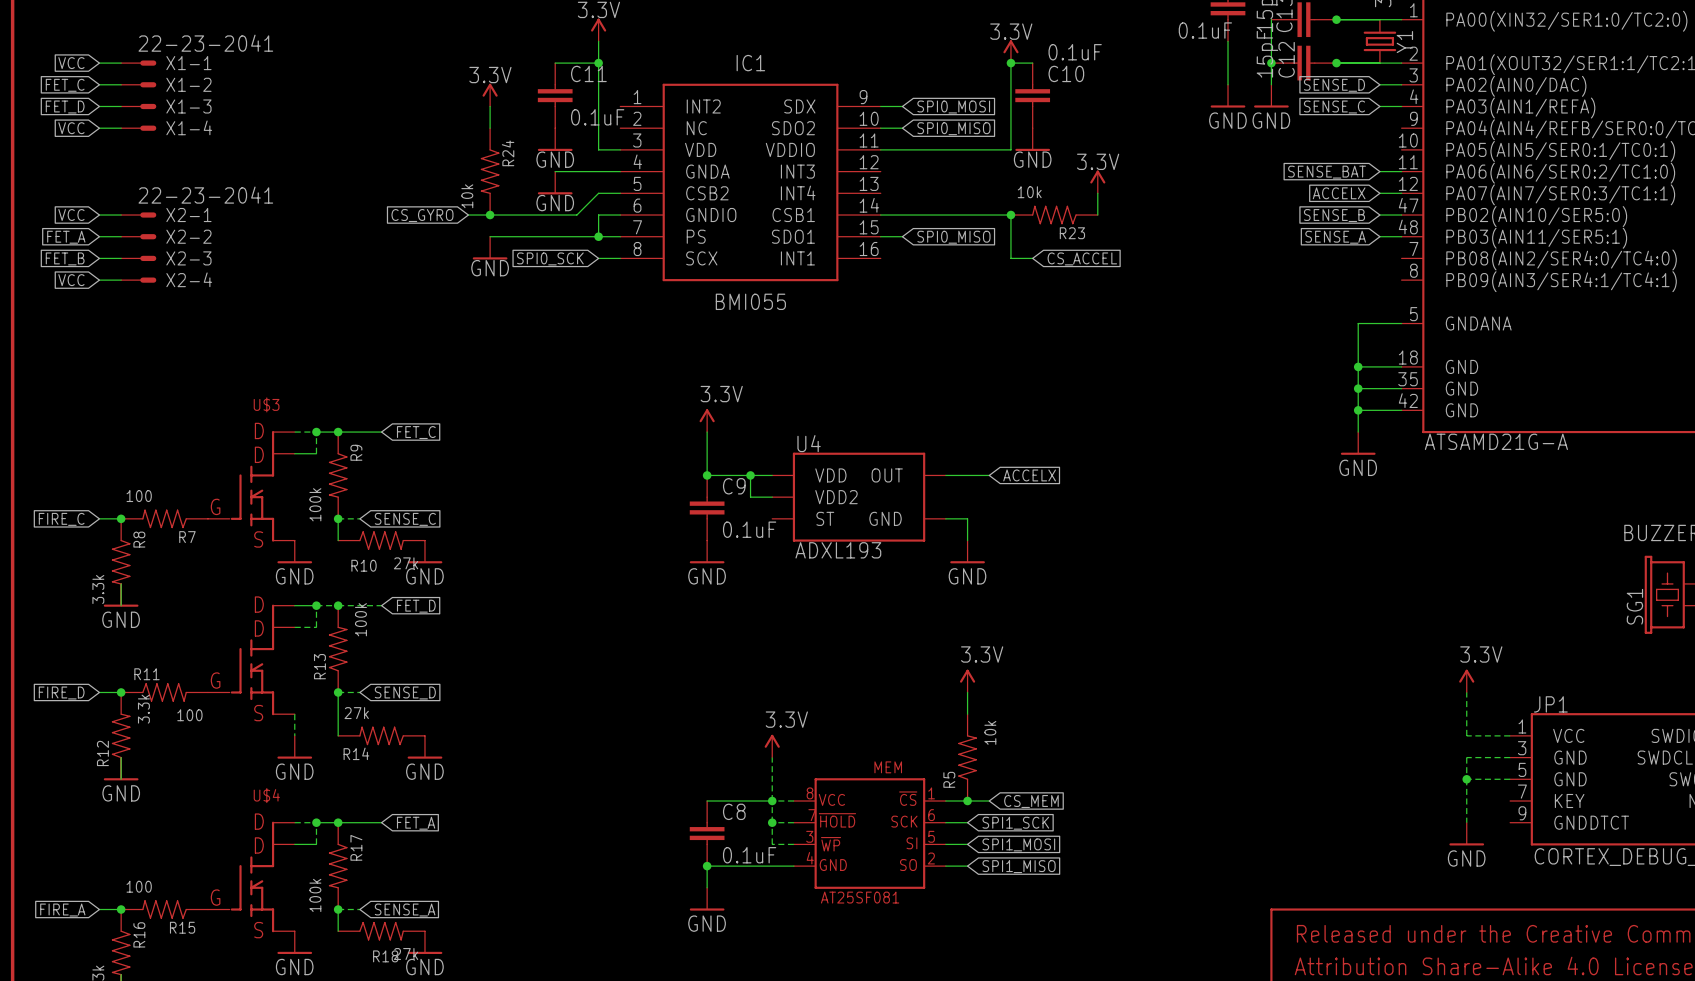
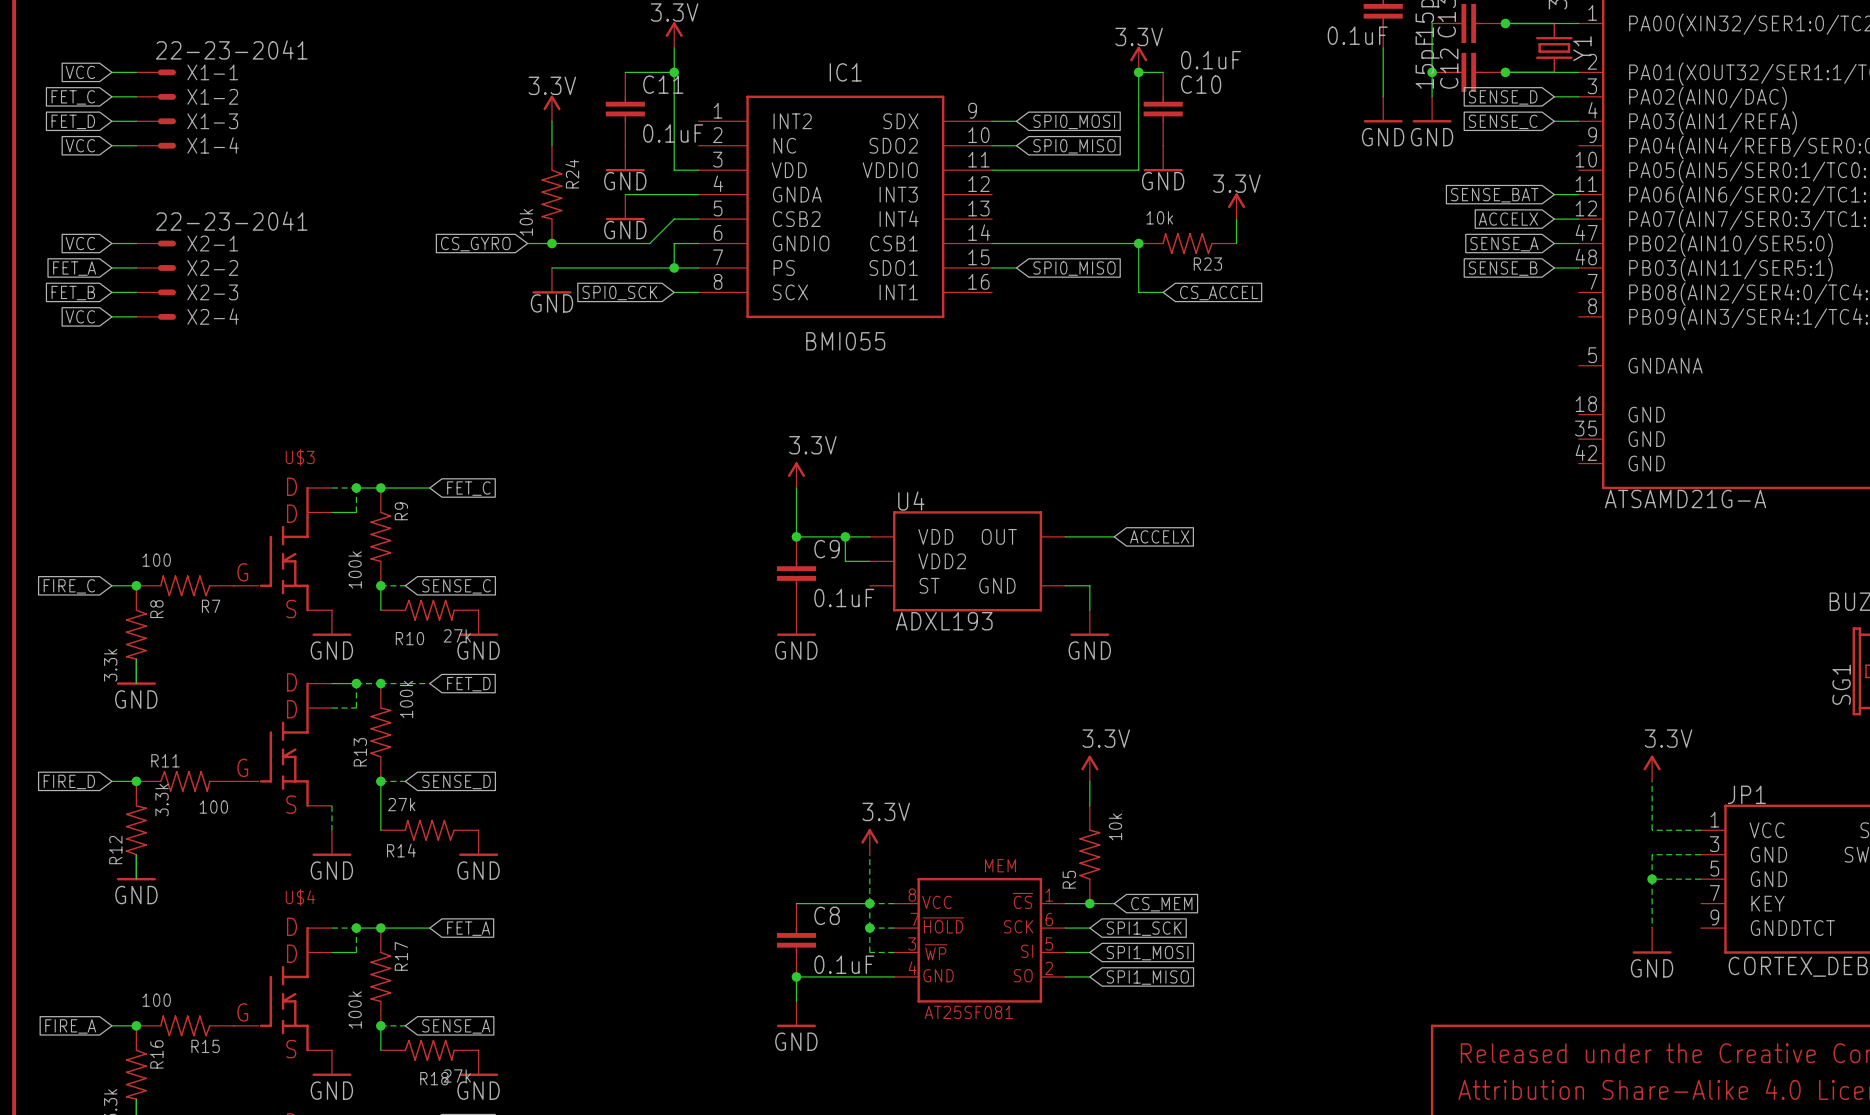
global label: SENSE_B (1334, 215) -> SENSE_A (1504, 244)
global label: SENSE_A (1335, 237) -> SENSE_B (1503, 268)
wire: (1401, 323) (1358, 323) (1358, 432) -> none
wire: (1358, 366) (1401, 366) -> none
junction: (1358, 366) -> none
wire: (1358, 388) (1401, 388) -> none
junction: (1358, 388) -> none
wire: (1358, 410) (1401, 410) -> none
junction: (1358, 410) -> none
power symbol: GND (1358, 443) -> none

